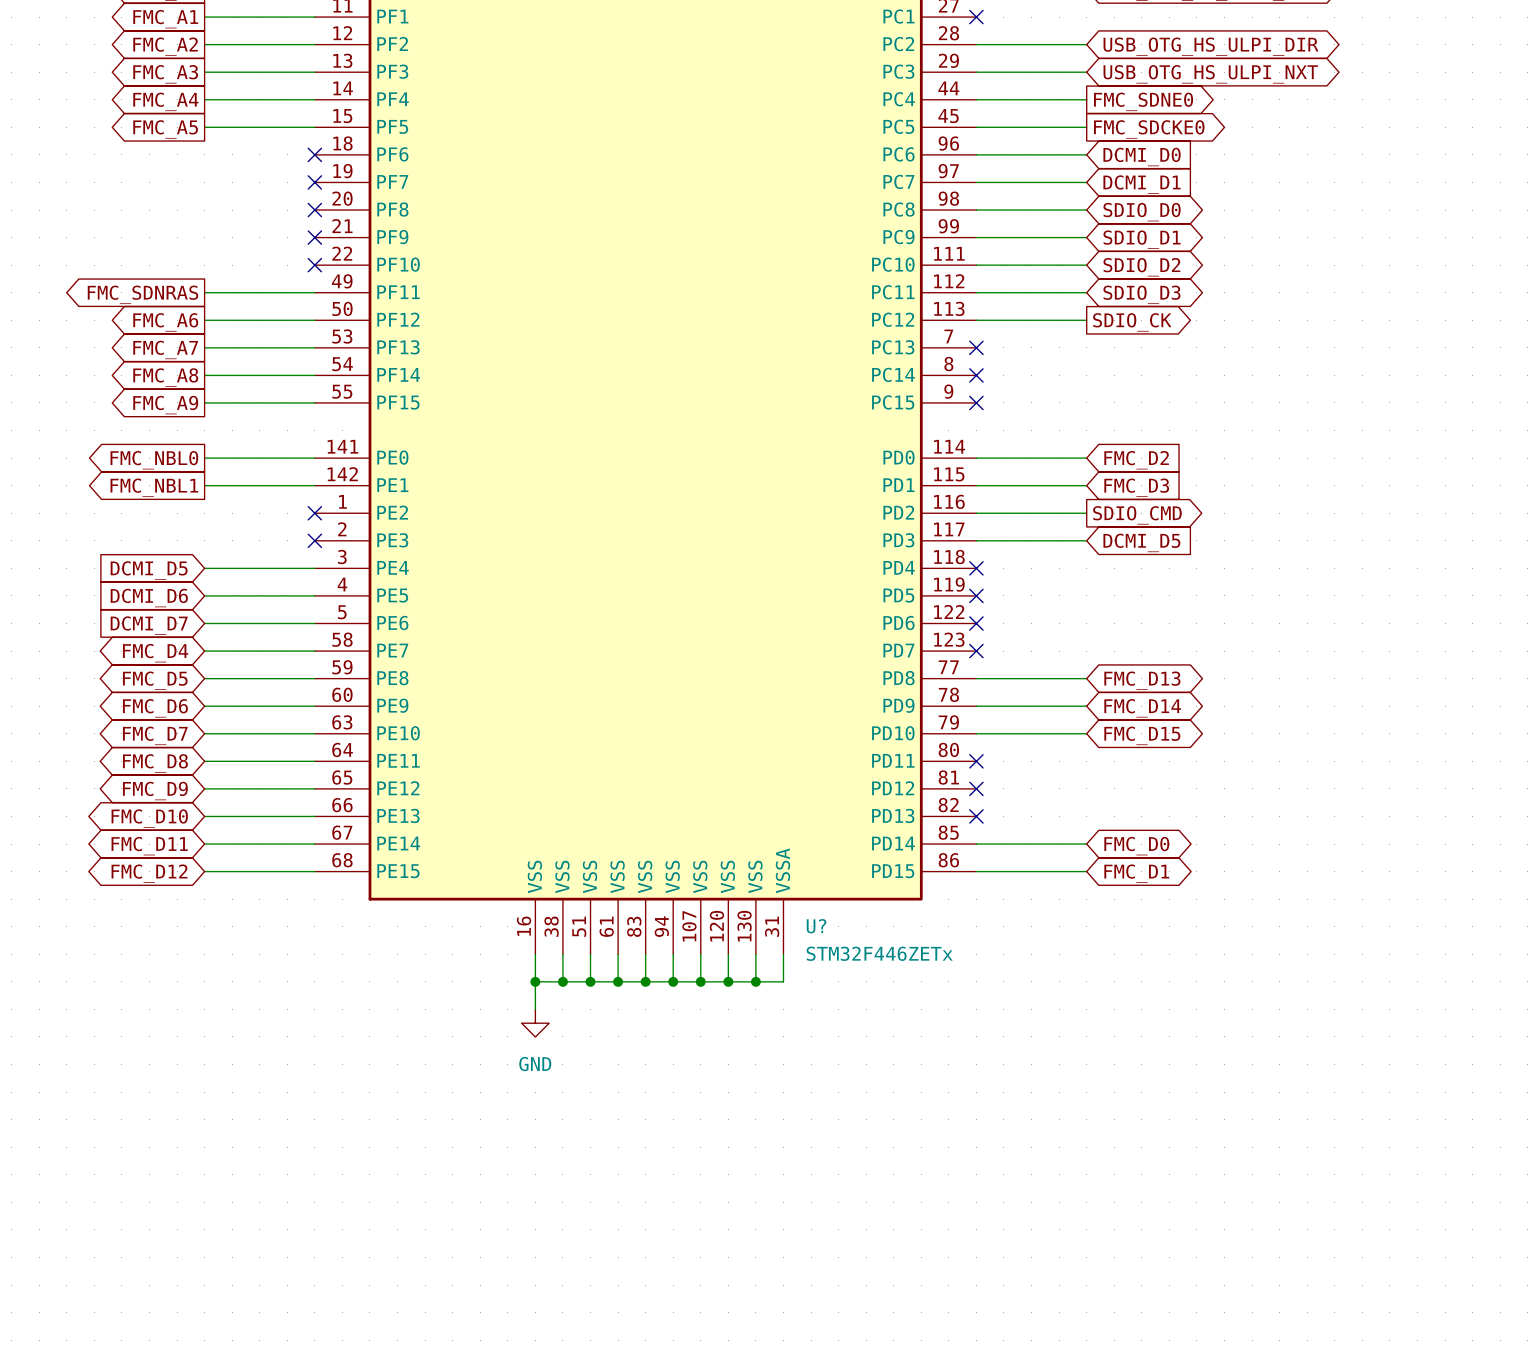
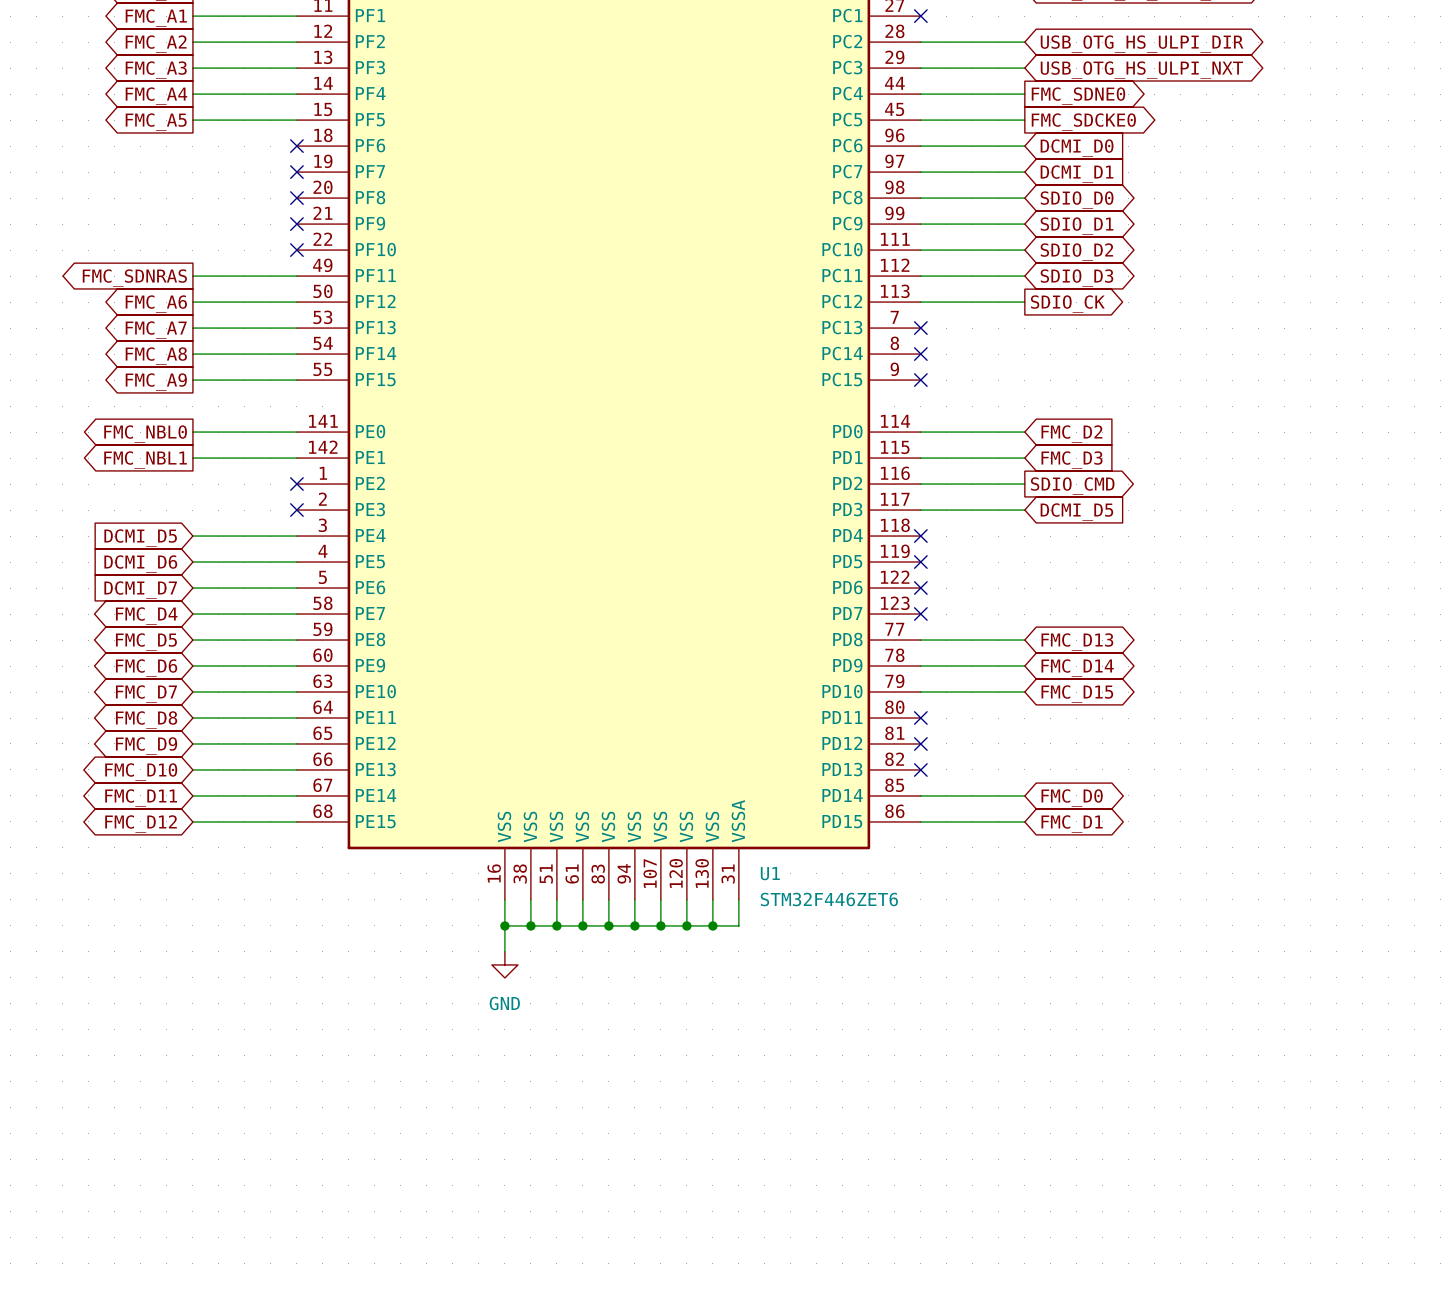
U? name: U? (816, 926) -> U1 (770, 873)
U? value: STM32F446ZETx (879, 953) -> STM32F446ZET6 (829, 899)

